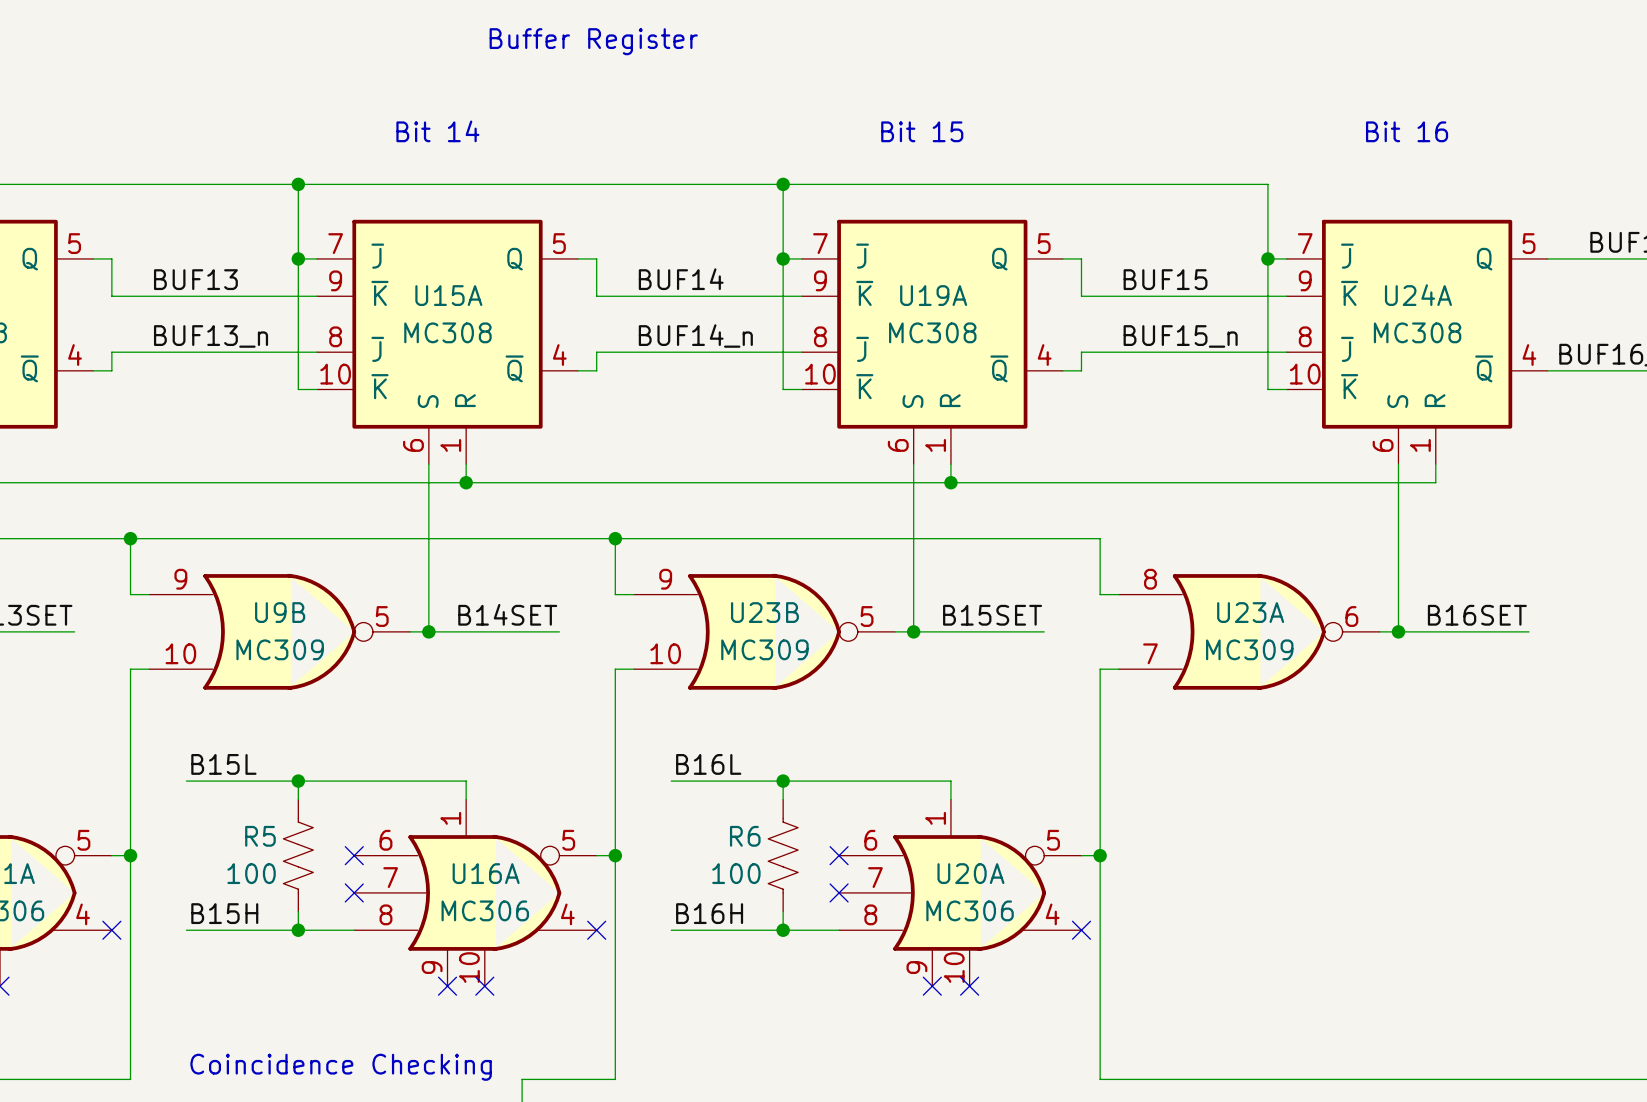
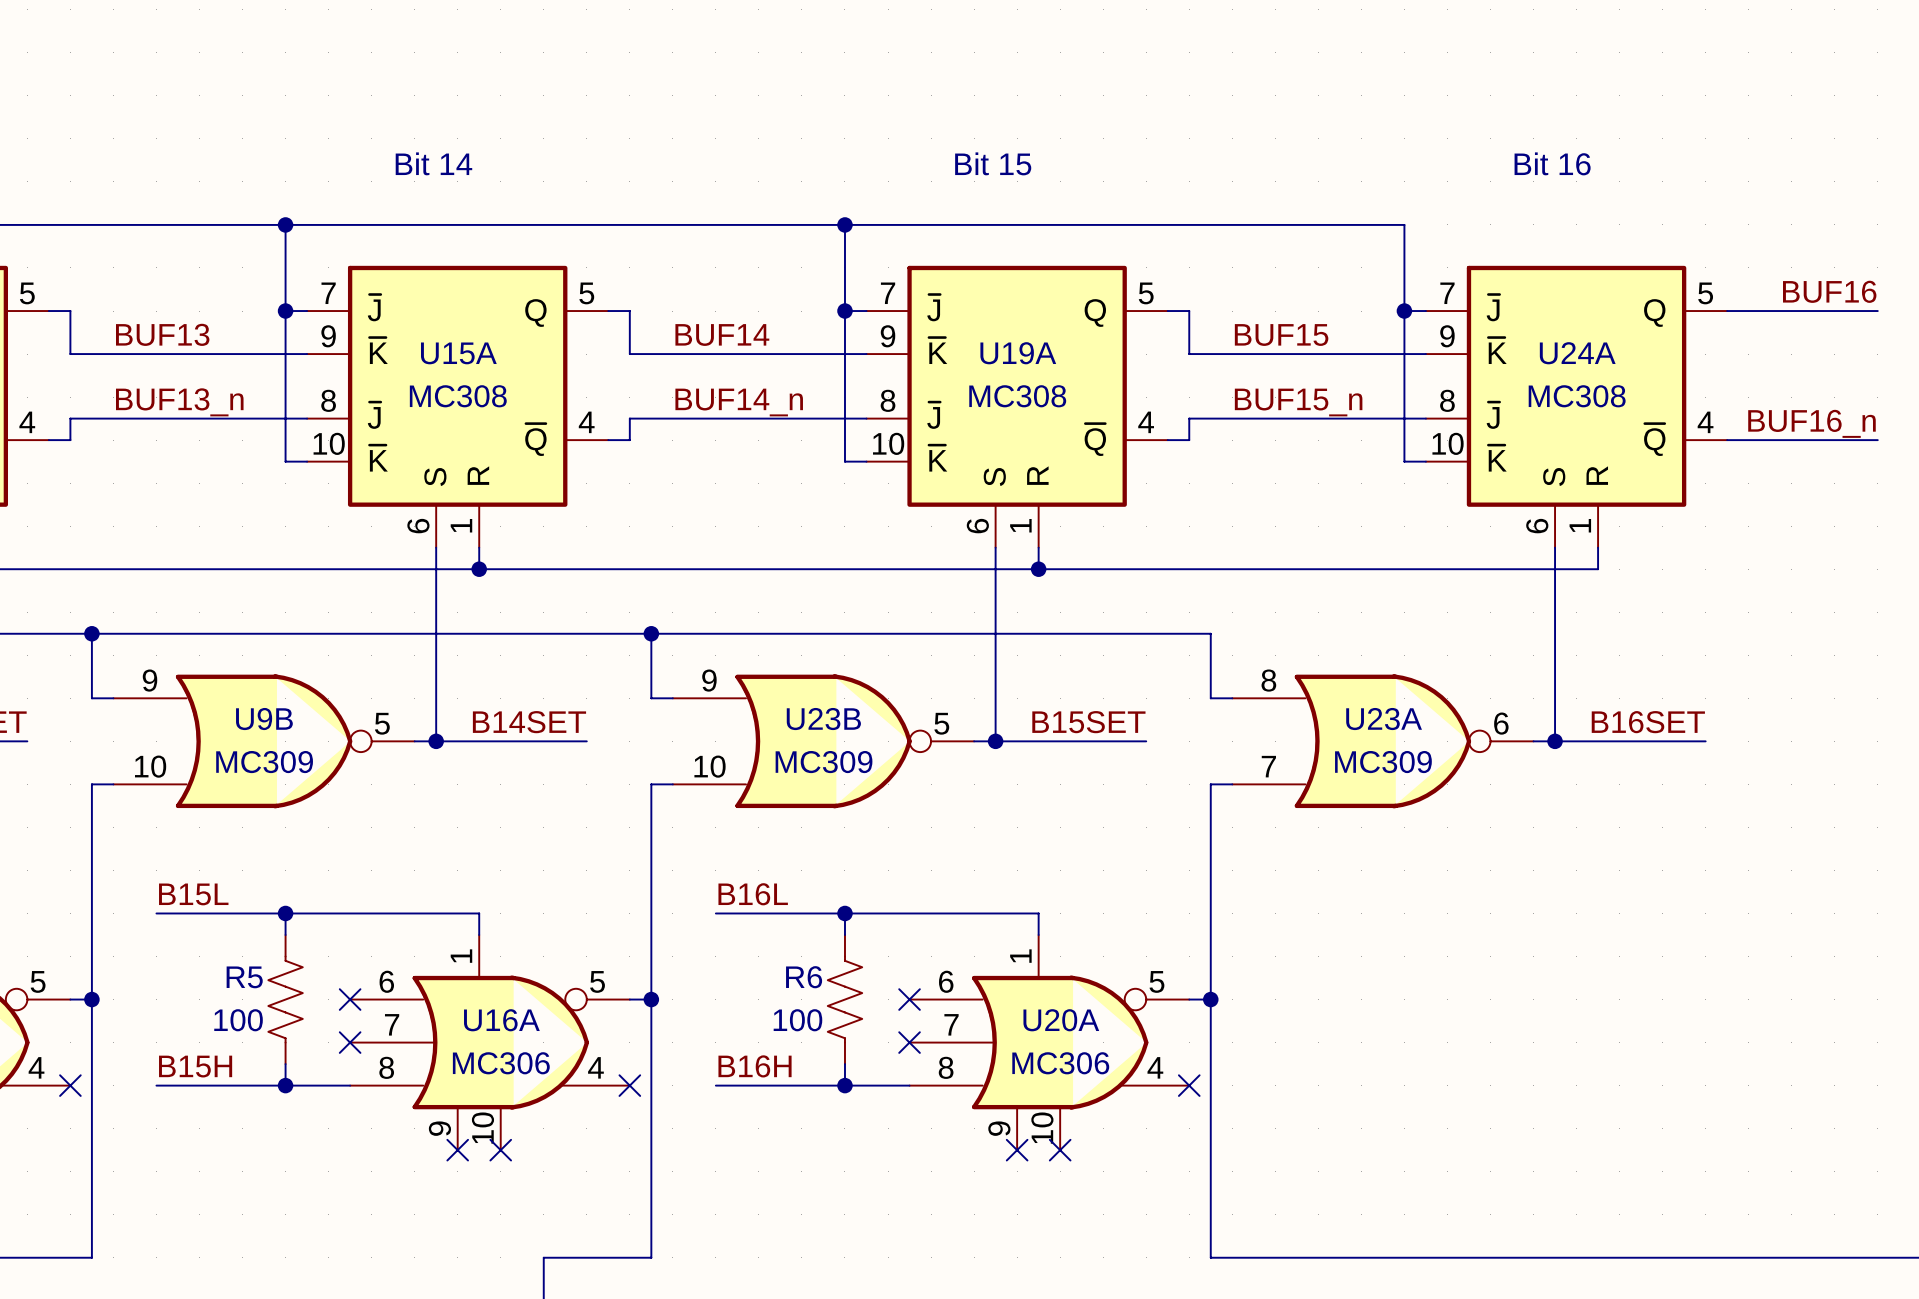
text: Buffer Register (593, 41) -> none
text: Coincidence Checking (341, 1067) -> none

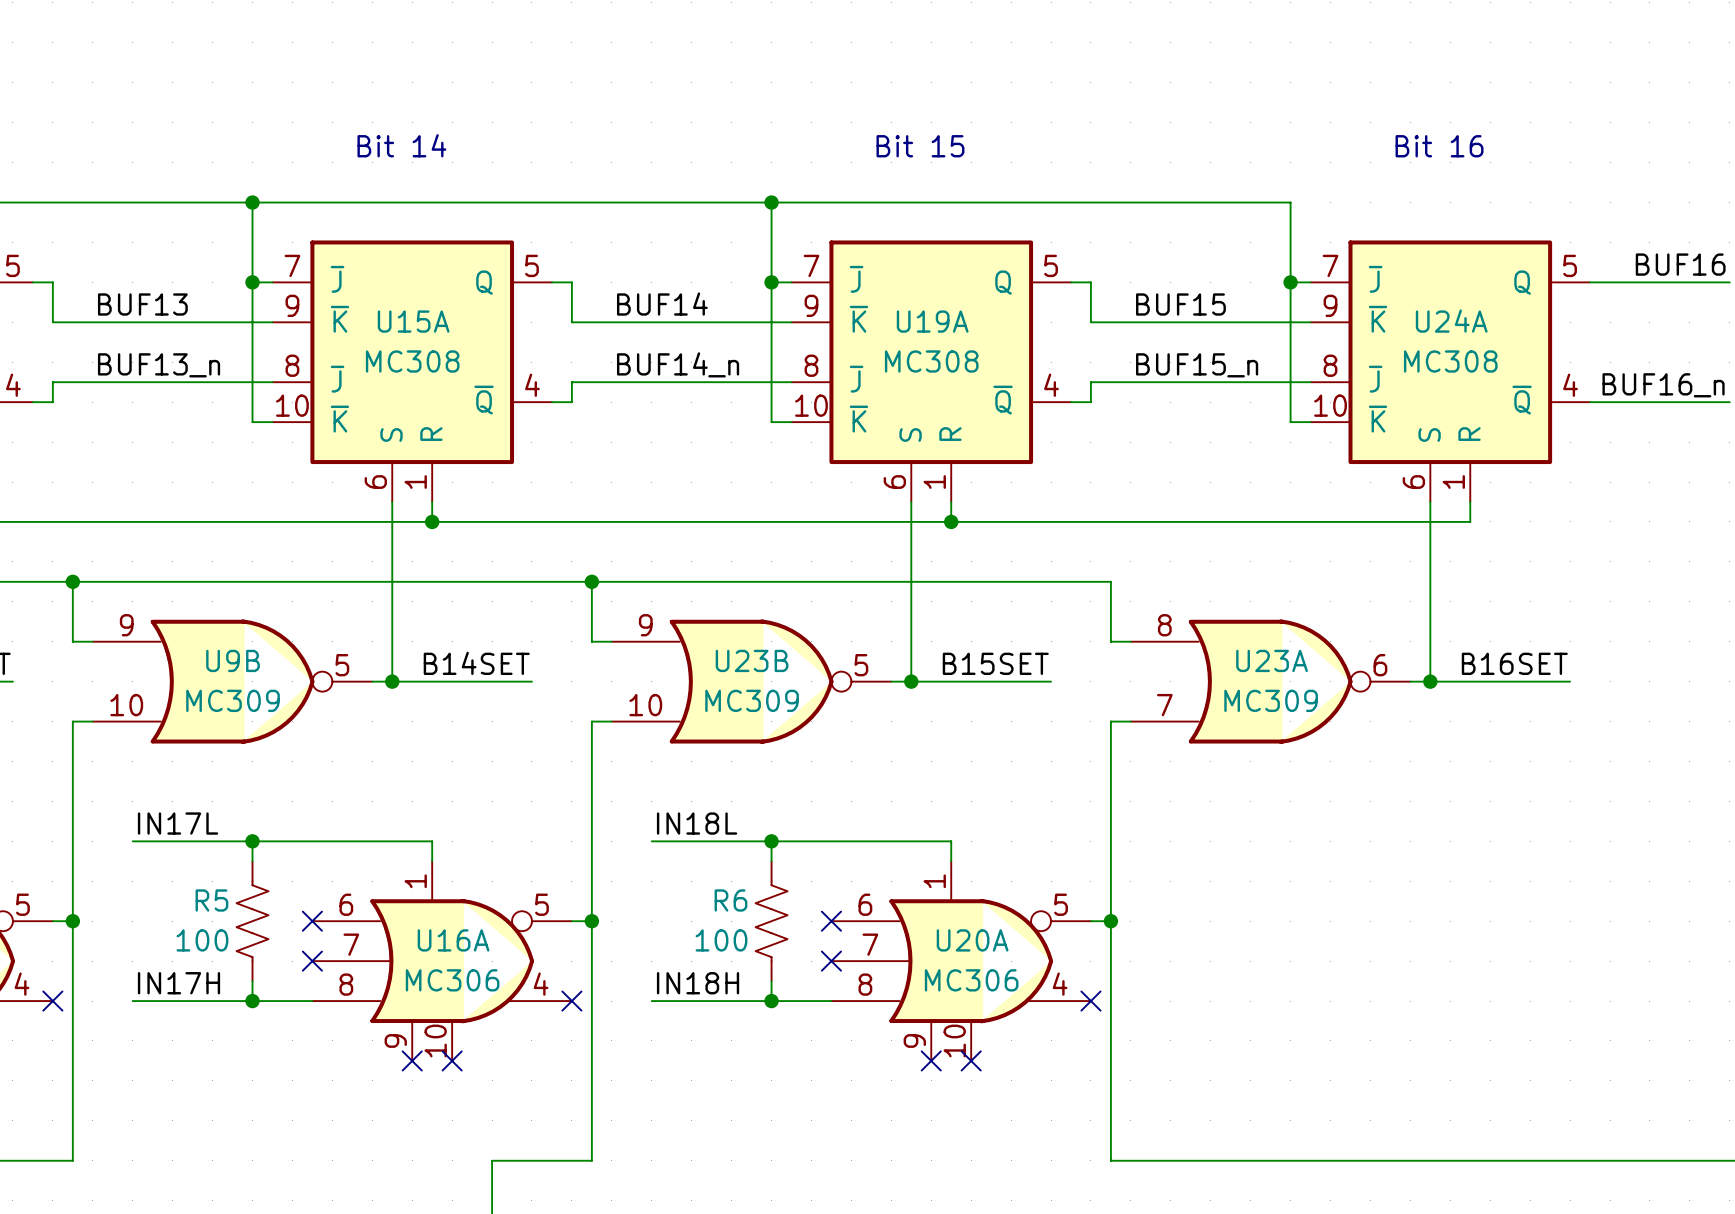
label: B15L (193, 894) -> IN17L (178, 823)
label: B16L (753, 894) -> IN18L (697, 823)
label: B15H (195, 1066) -> IN17H (178, 983)
label: B16H (755, 1066) -> IN18H (698, 983)

